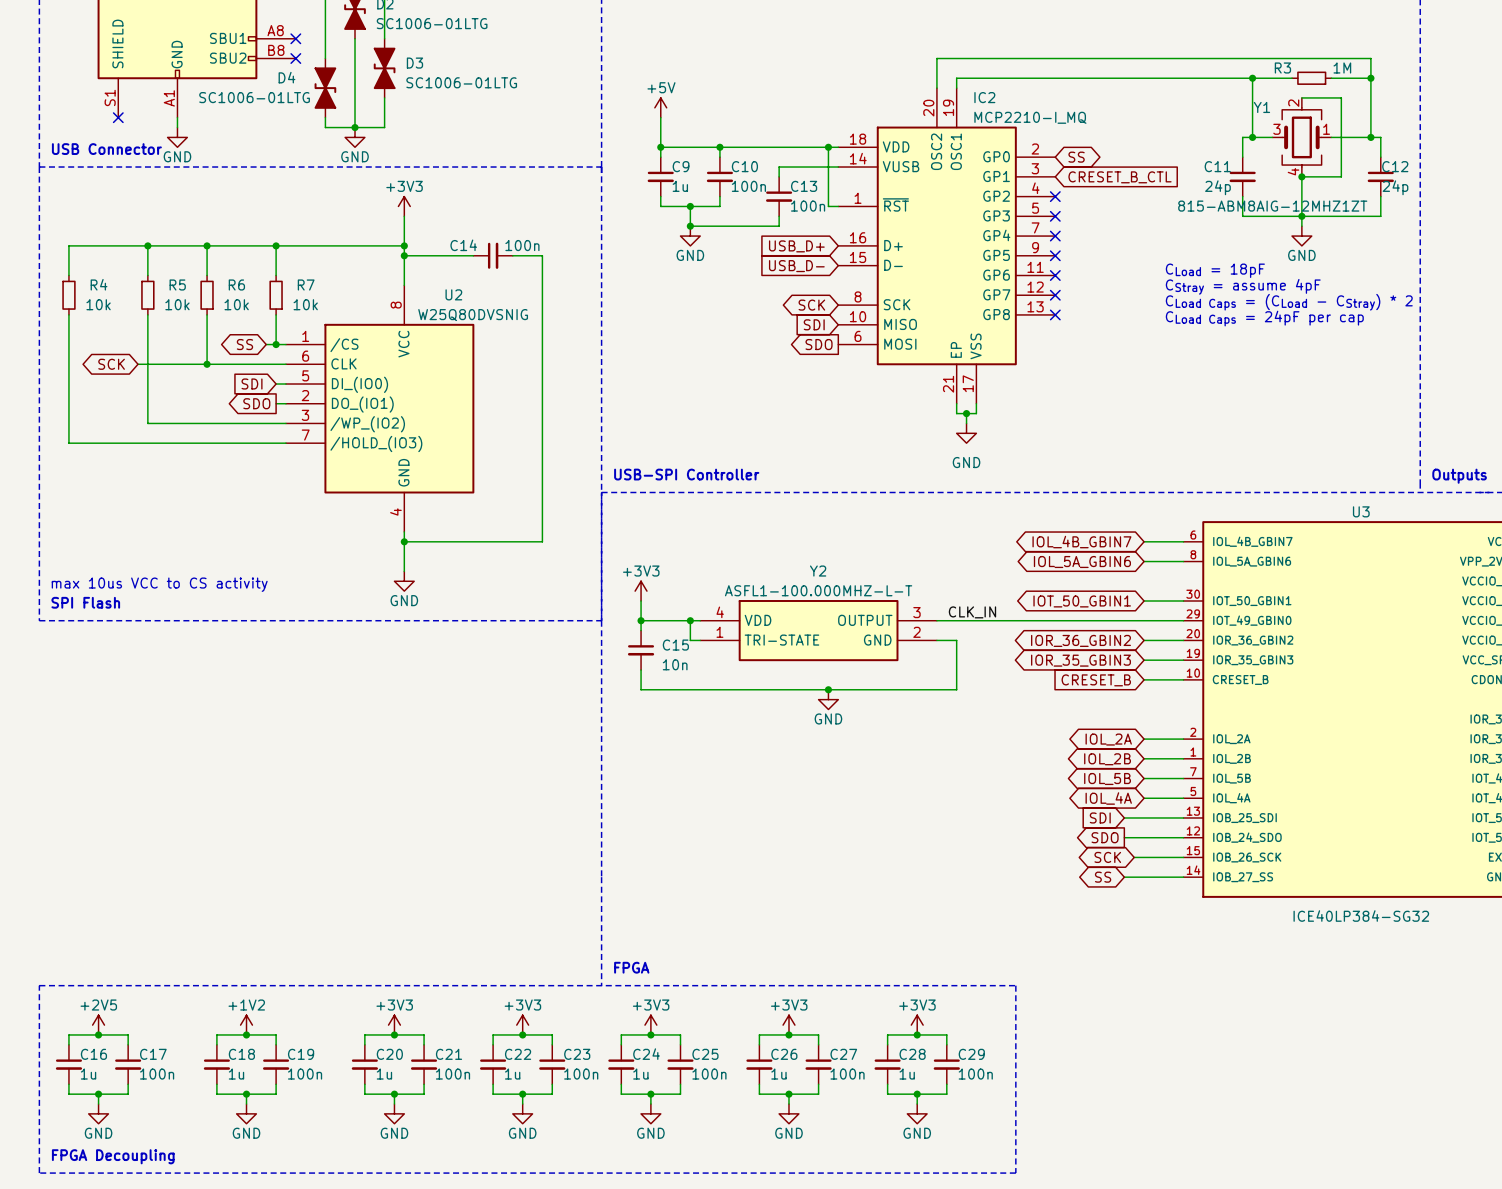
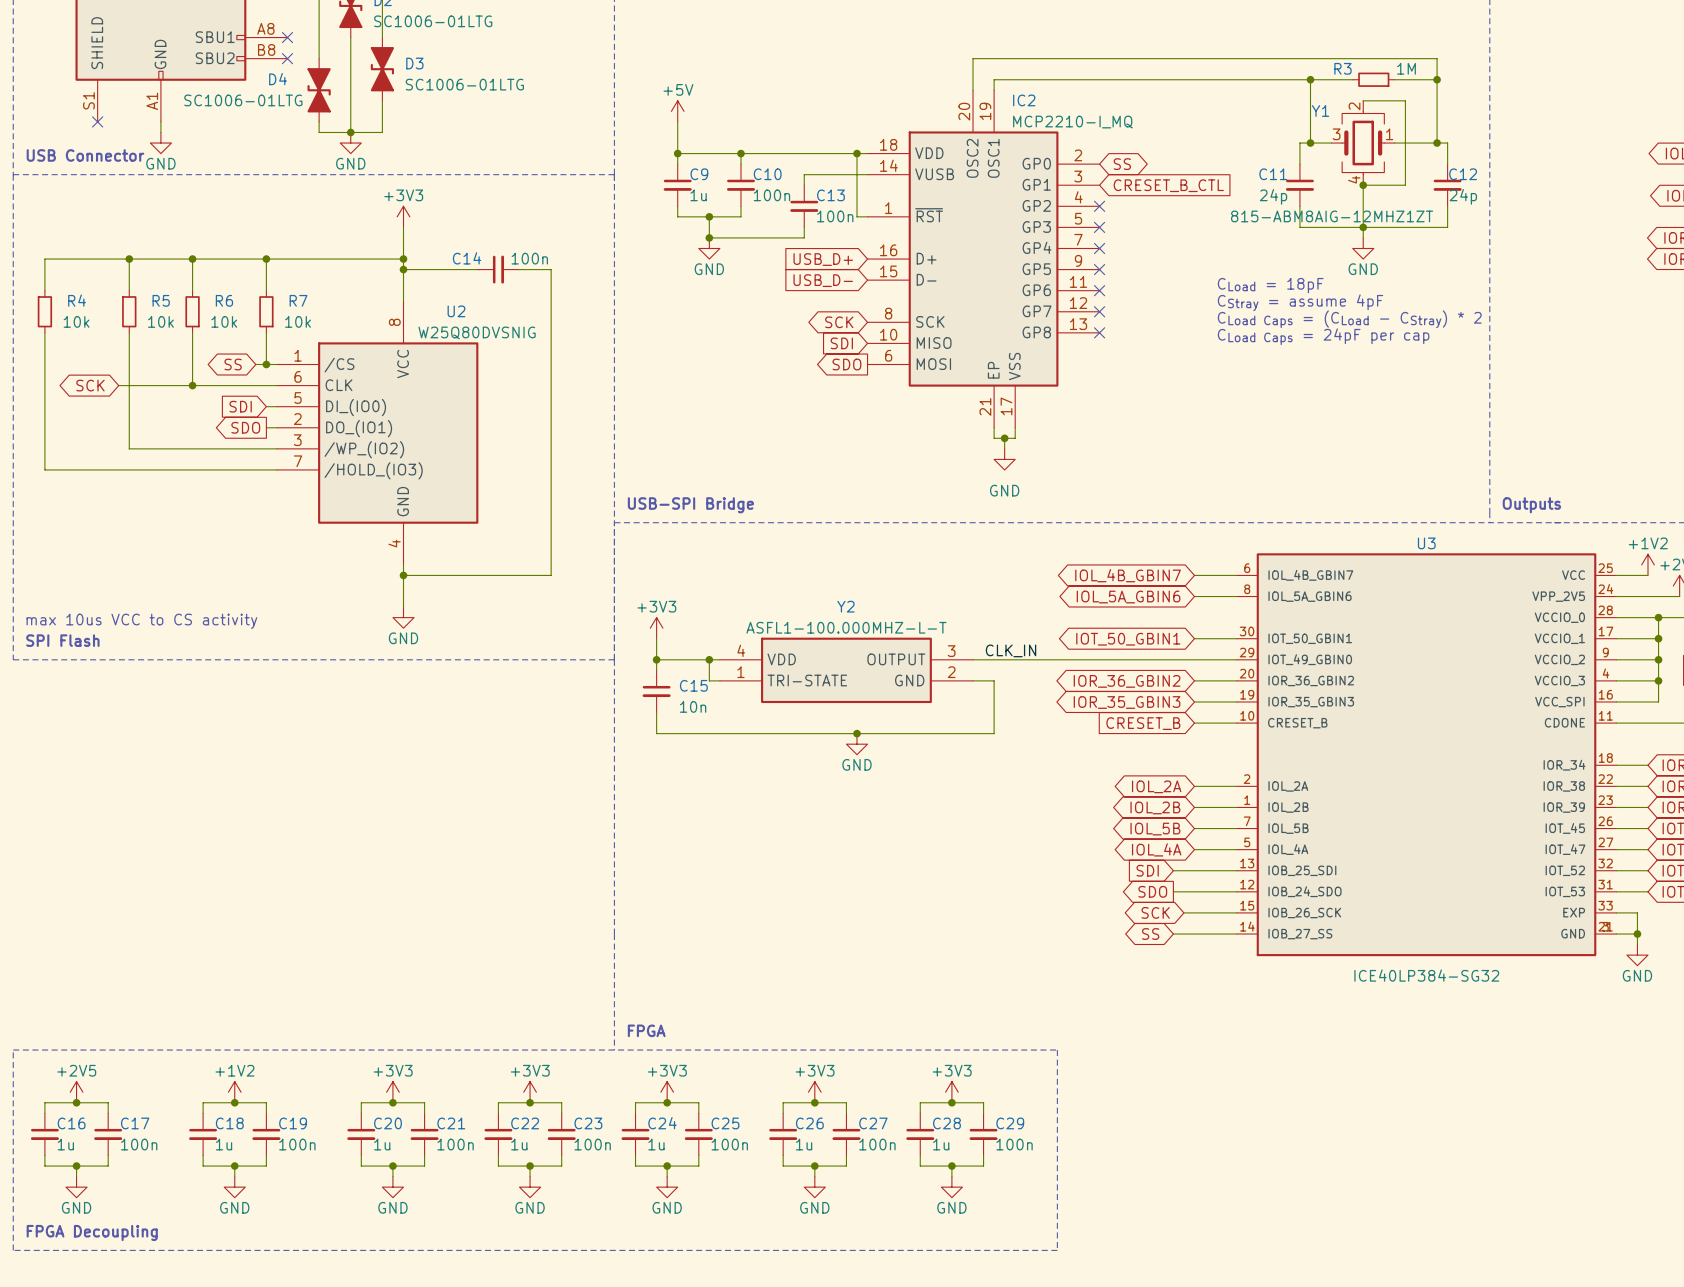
text: USB-SPI Controller (686, 474) -> USB-SPI Bridge (690, 505)

